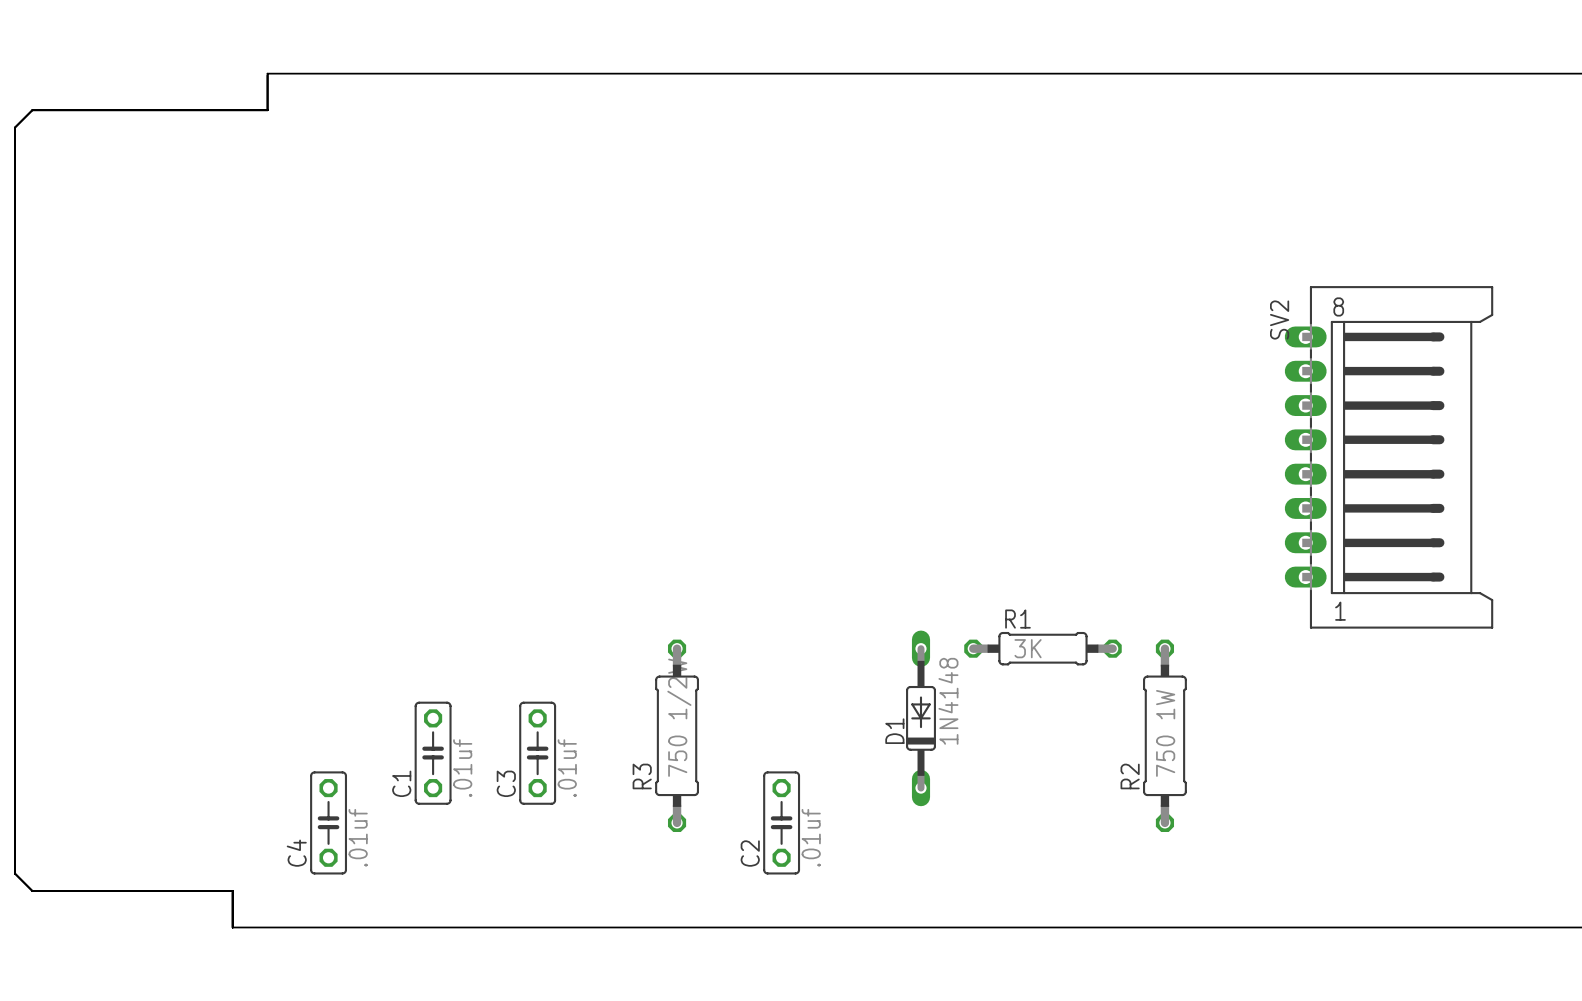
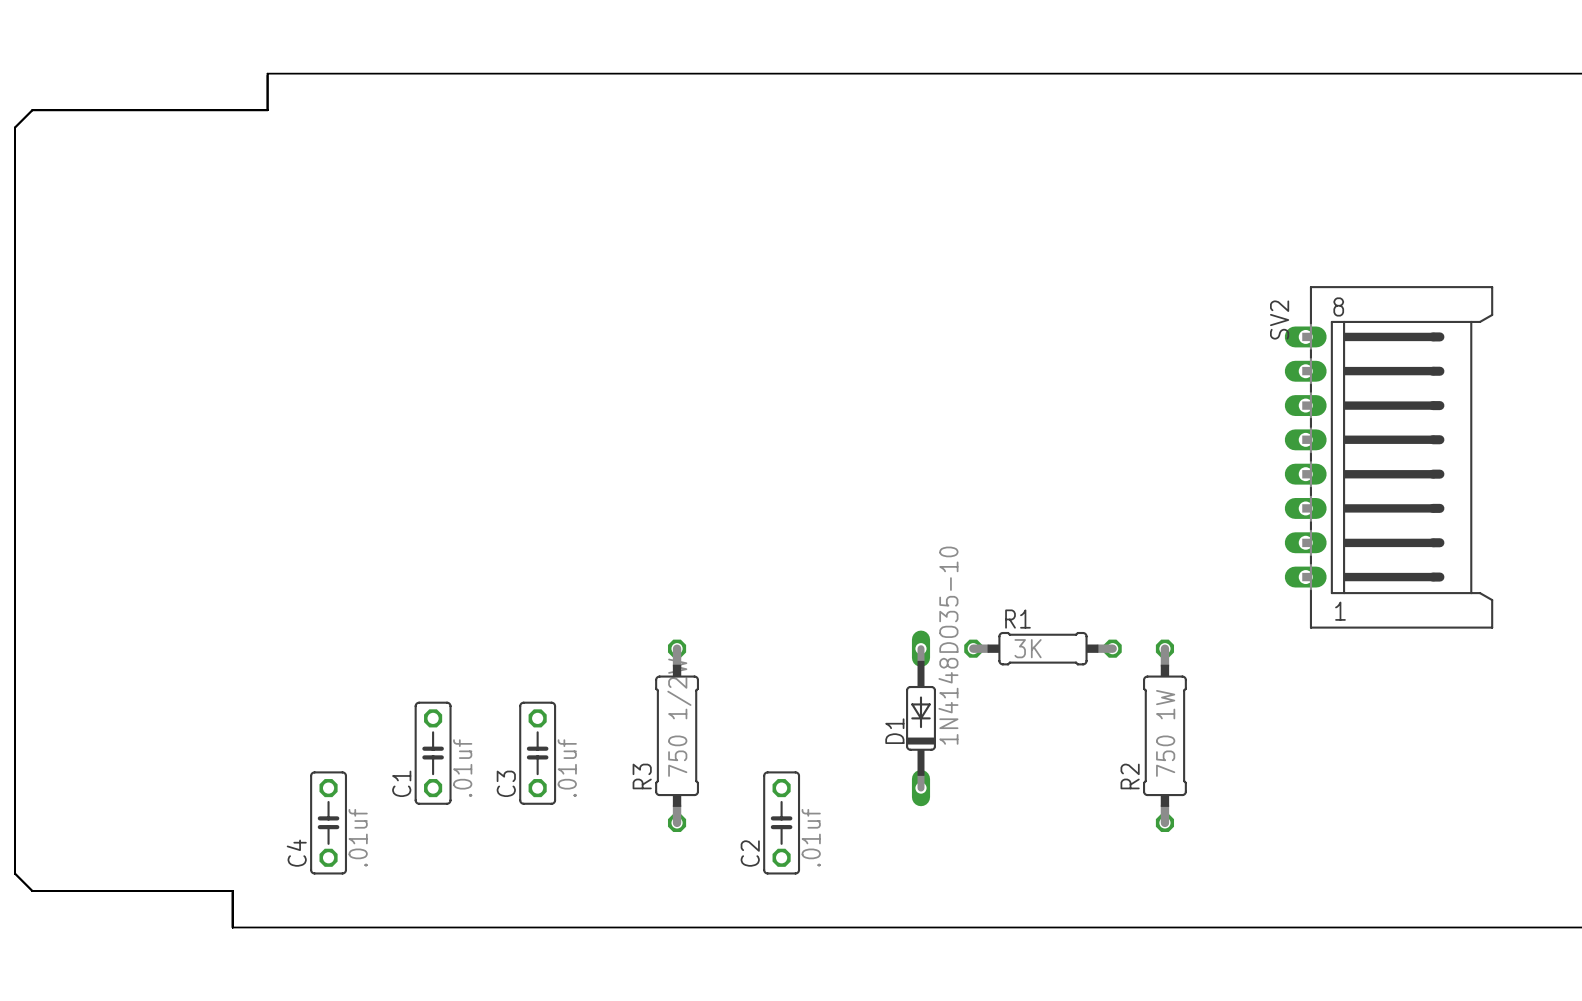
D1 value: 1N4148 (948, 701) -> 1N4148DO35-10 (948, 645)

